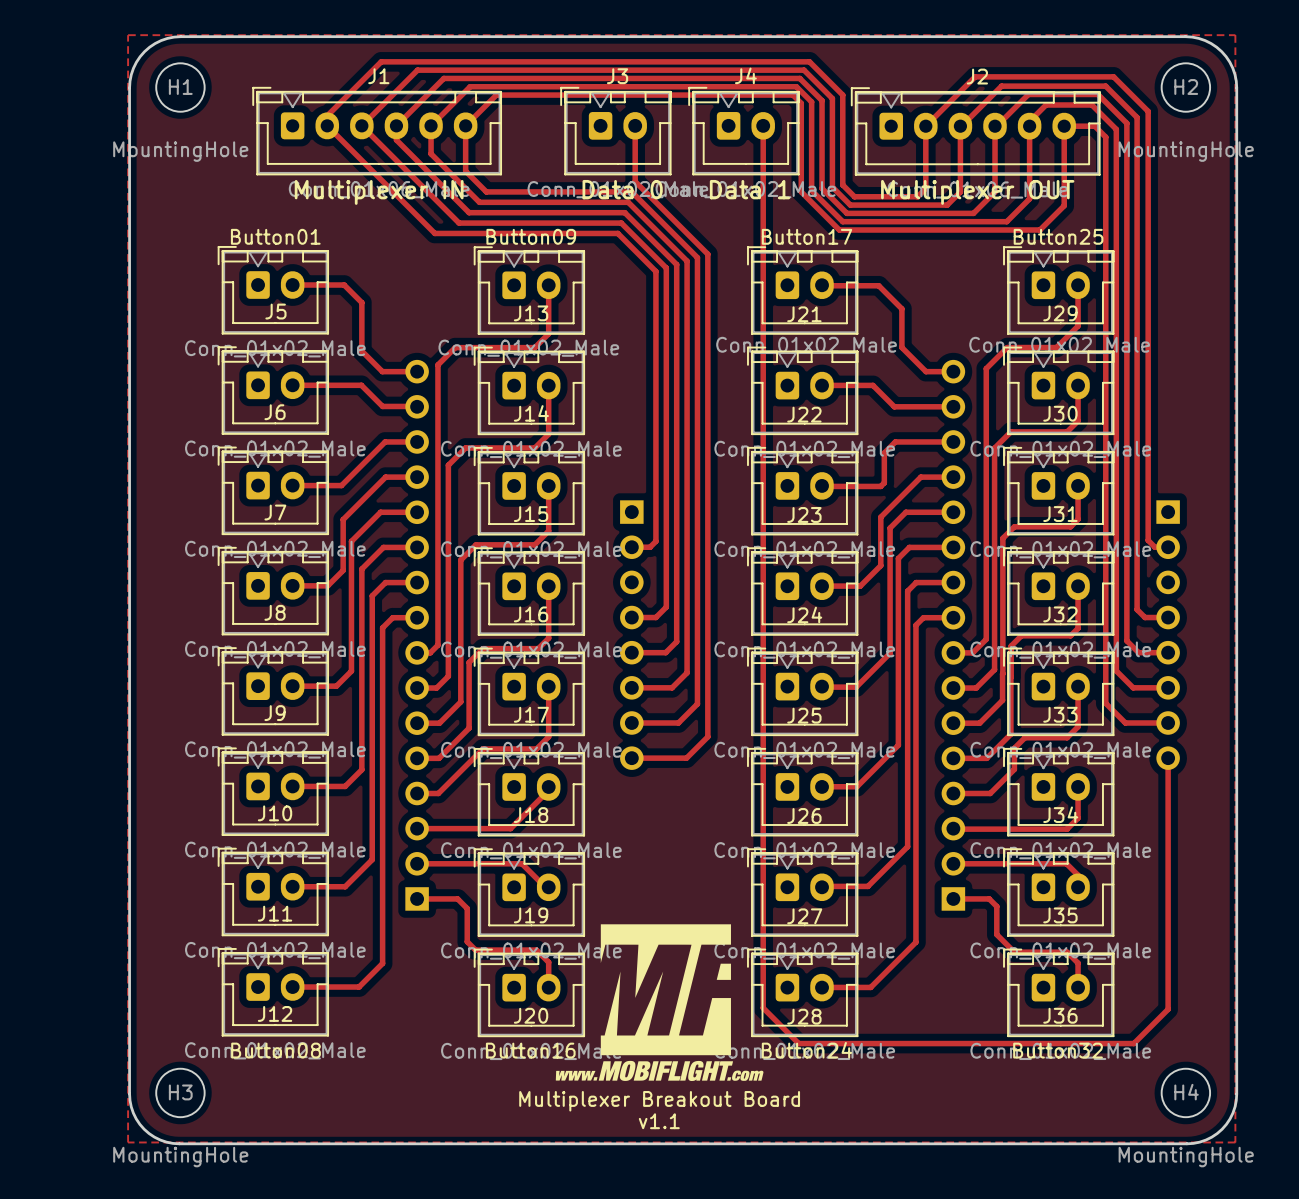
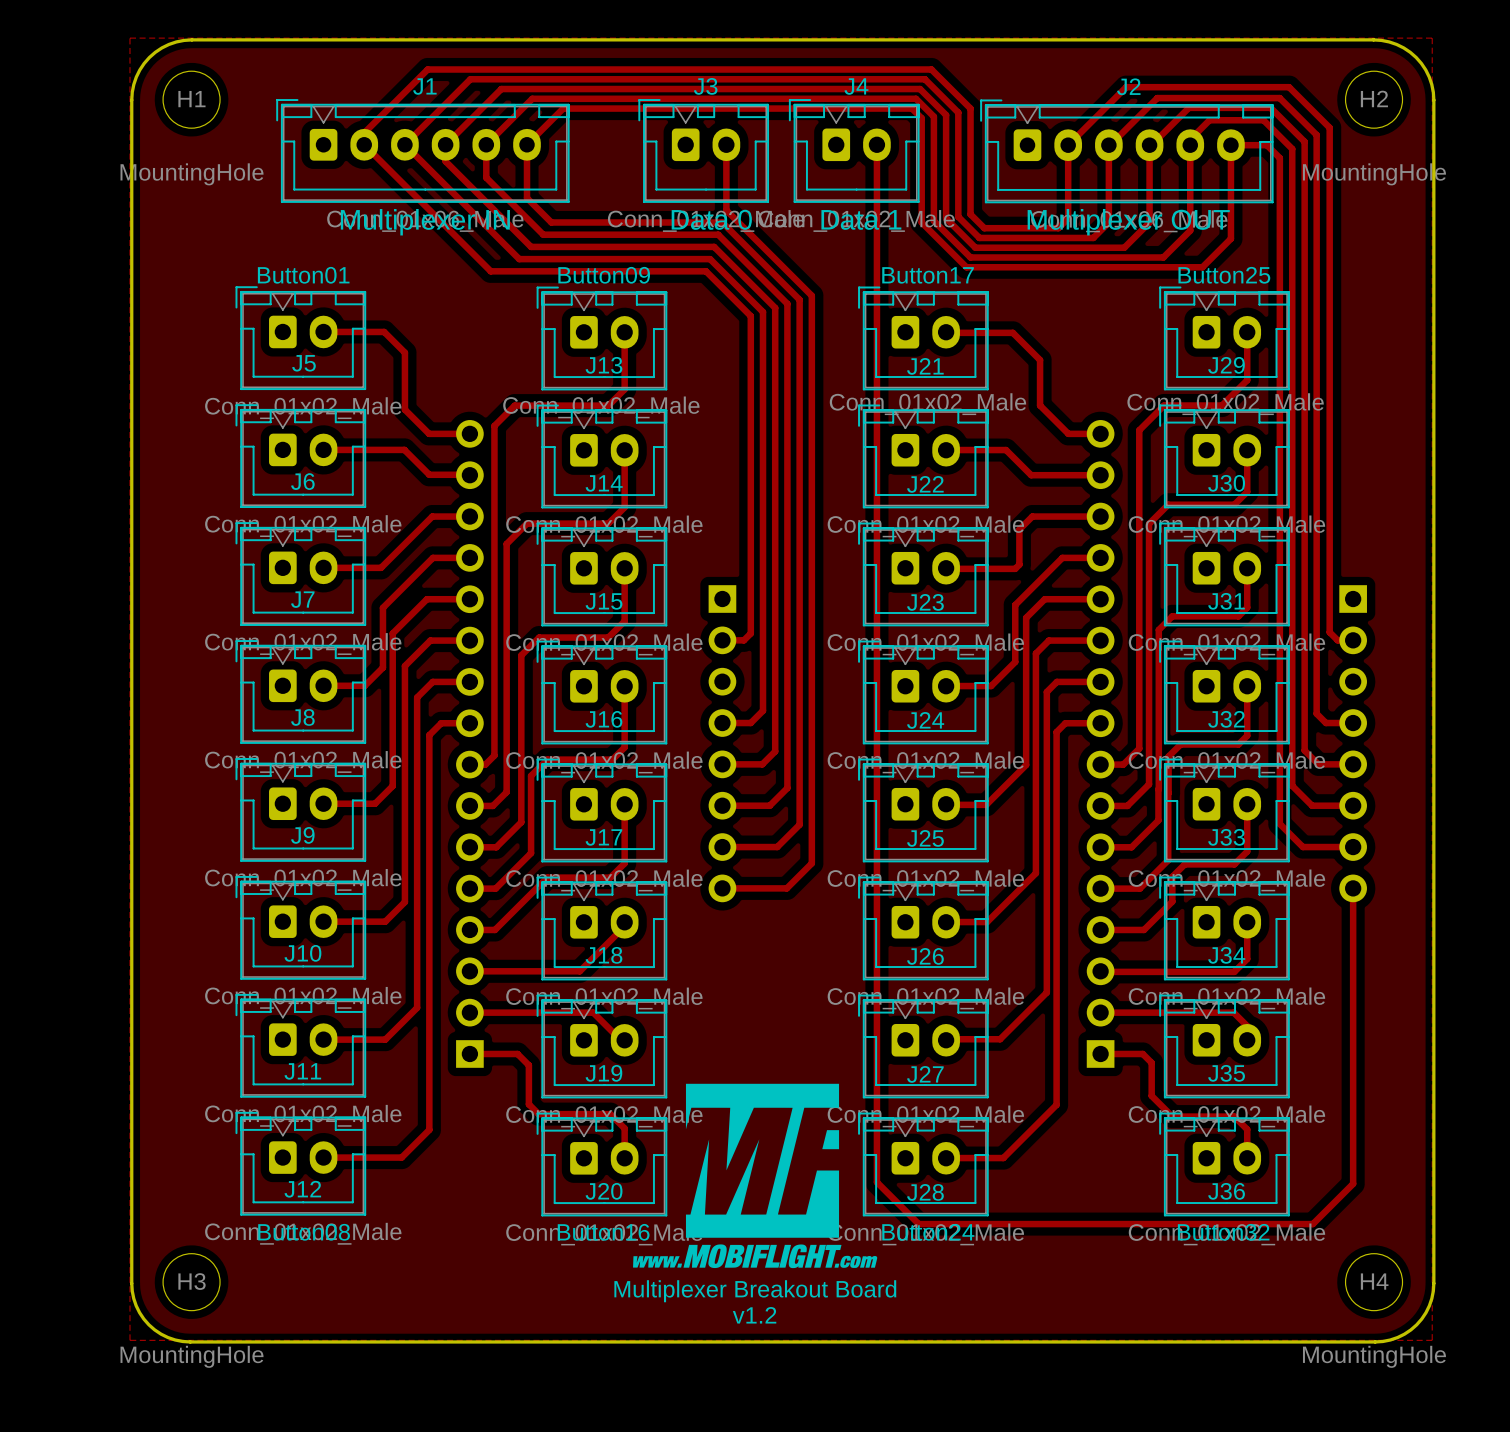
text: v1.1 (659, 1121) -> v1.2 (754, 1315)

